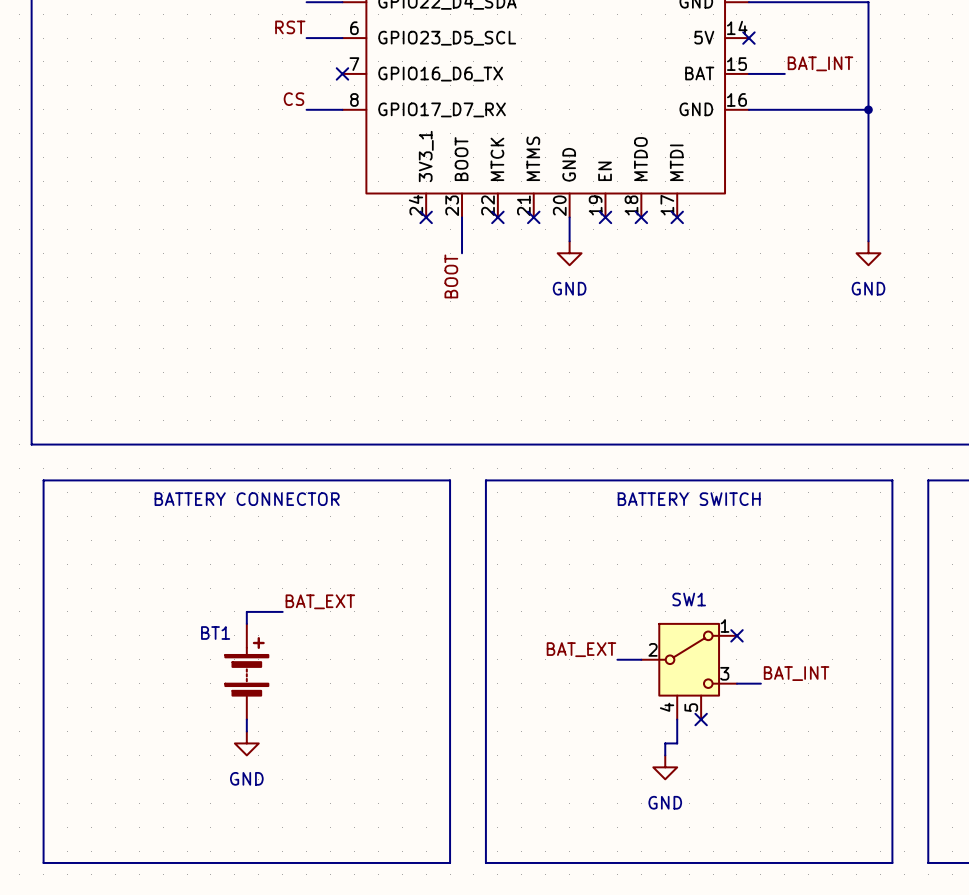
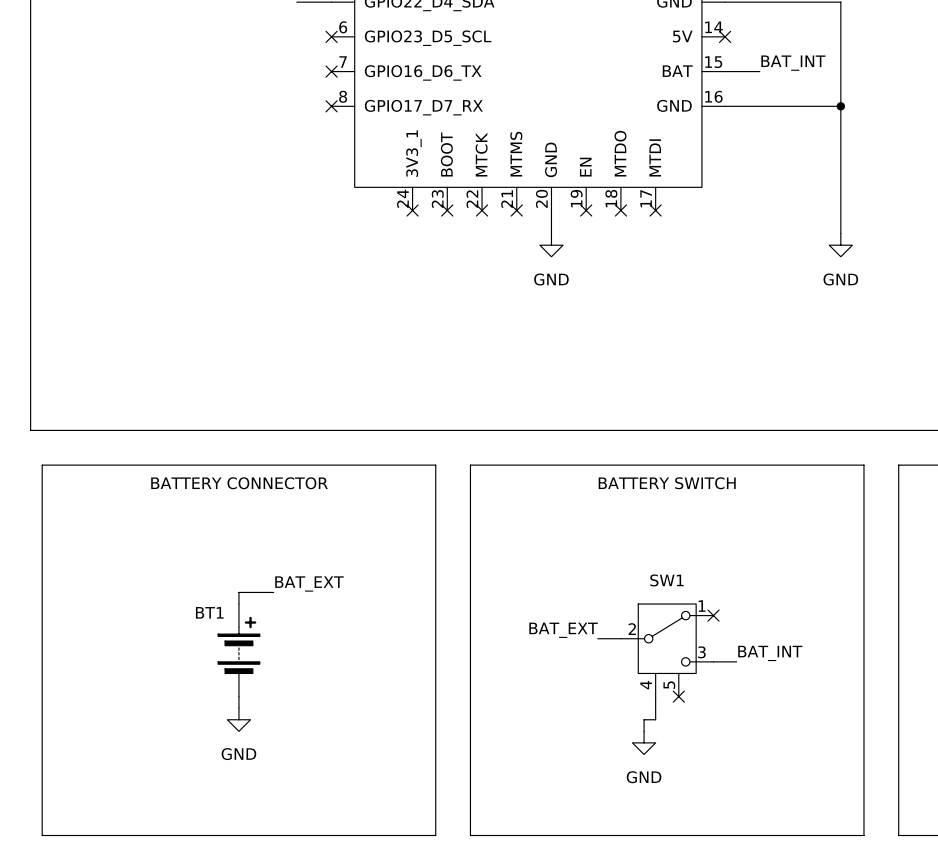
label: RST (290, 27) -> none
wire: (306, 38) (342, 38) -> none
no-connect mark: none -> (331, 36)
label: CS (293, 99) -> none
wire: (306, 109) (342, 109) -> none
no-connect mark: none -> (331, 106)
wire: (462, 217) (462, 253) -> none
no-connect mark: none -> (447, 210)
label: BOOT (451, 276) -> none

